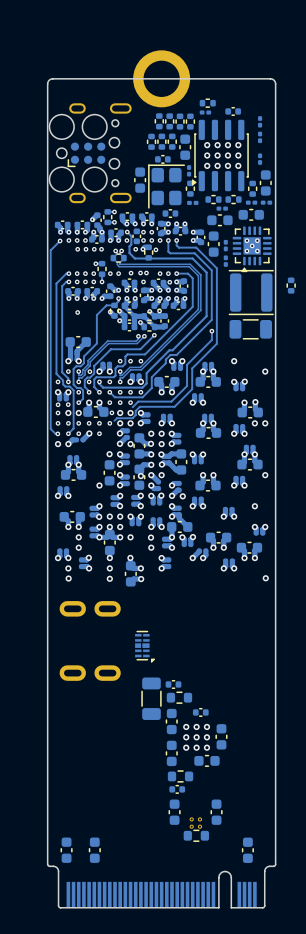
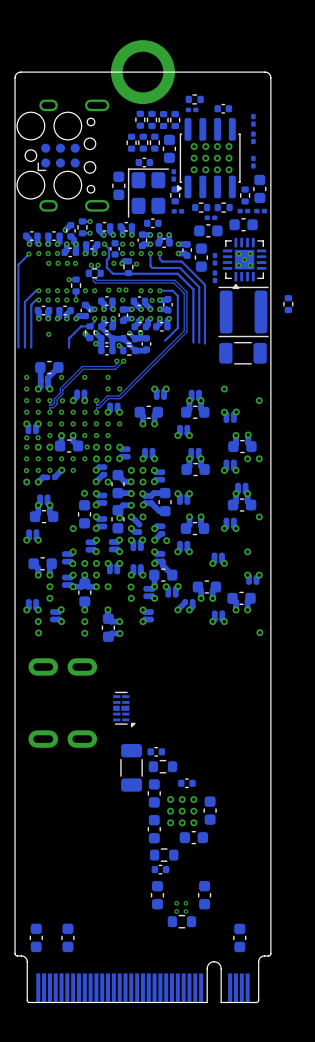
track: (96, 315) (96, 343) (83, 356) (83, 363) (73, 368) (73, 384) (83, 390) (83, 398) (78, 402) -> (70, 337) (69, 347)
track: (206, 316) (146, 373) (146, 383) (142, 387) (103, 387) (99, 381) -> (193, 338) (193, 342)
track: (181, 318) (145, 354) (127, 354) (125, 356) (125, 363) (115, 368) (113, 377) (96, 377) (94, 379) (94, 387) (99, 392) -> none
track: (211, 319) (176, 354) (170, 354) (165, 359) (165, 363) (151, 377) (151, 388) (142, 397) (114, 397) (109, 392) -> none
track: (216, 320) (216, 343) (192, 368) (192, 389) (174, 406) (139, 406) (132, 418) (117, 418) (114, 420) -> none
track: (50, 324) (50, 429) (57, 433) -> none
track: (56, 324) (56, 373) (63, 380) (65, 386) (69, 386) (73, 390) (73, 428) (68, 433) -> none
track: (62, 324) (62, 372) (68, 378) (68, 381) -> none
track: (211, 331) (211, 339) (187, 364) (187, 386) (171, 401) (138, 401) (132, 407) -> none
via: (211, 331) -> none
track: (154, 335) (140, 349) (110, 349) (94, 365) (94, 373) (84, 380) (84, 386) (89, 392) -> none
via: (154, 335) -> none
via: none -> (26, 377)
via: none -> (61, 377)
via: none -> (84, 377)
via: none -> (108, 377)
via: none -> (26, 389)
via: (120, 361) -> none
via: none -> (26, 400)

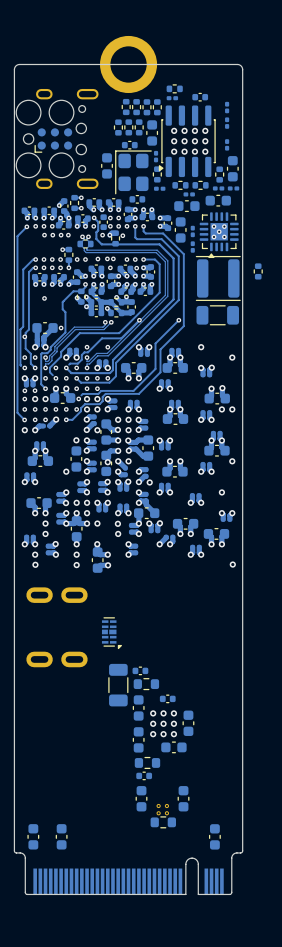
track: (193, 335) (193, 342) -> (173, 299) (112, 360) (112, 370) (109, 373) (71, 373) (66, 367)
track: (199, 336) (199, 342) -> (178, 300) (116, 362) (116, 376) (109, 382) (81, 382) (76, 378)
track: none -> (148, 304) (119, 333) (79, 333) (61, 351) (61, 356) (49, 367) (49, 372) (52, 375)
track: none -> (183, 306) (183, 326) (160, 349) (160, 372) (138, 393) (105, 393) (99, 404) (85, 404) (72, 419) (66, 419)
track: (69, 346) (69, 347) -> (62, 309) (65, 312) (65, 332) (47, 353) (41, 354) (41, 384) (45, 388)
track: none -> (17, 310) (17, 412) (24, 419)
track: none -> (23, 310) (23, 326) (20, 329) (21, 365)
track: none -> (28, 310) (28, 329) (25, 332) (25, 348) (30, 353) (30, 363) (35, 367)
track: none -> (139, 320) (121, 338) (102, 338) (88, 352) (81, 354) (81, 359) (77, 363) (69, 364)
via: none -> (139, 320)
track: none -> (178, 320) (155, 343) (155, 368) (133, 390) (101, 390) (98, 393) (81, 395)
via: none -> (178, 320)
via: none -> (61, 328)
via: (61, 377) -> none
via: (84, 377) -> none
via: (108, 377) -> none
via: (26, 389) -> none
via: none -> (87, 347)
via: (108, 389) -> none
via: (62, 400) -> none

